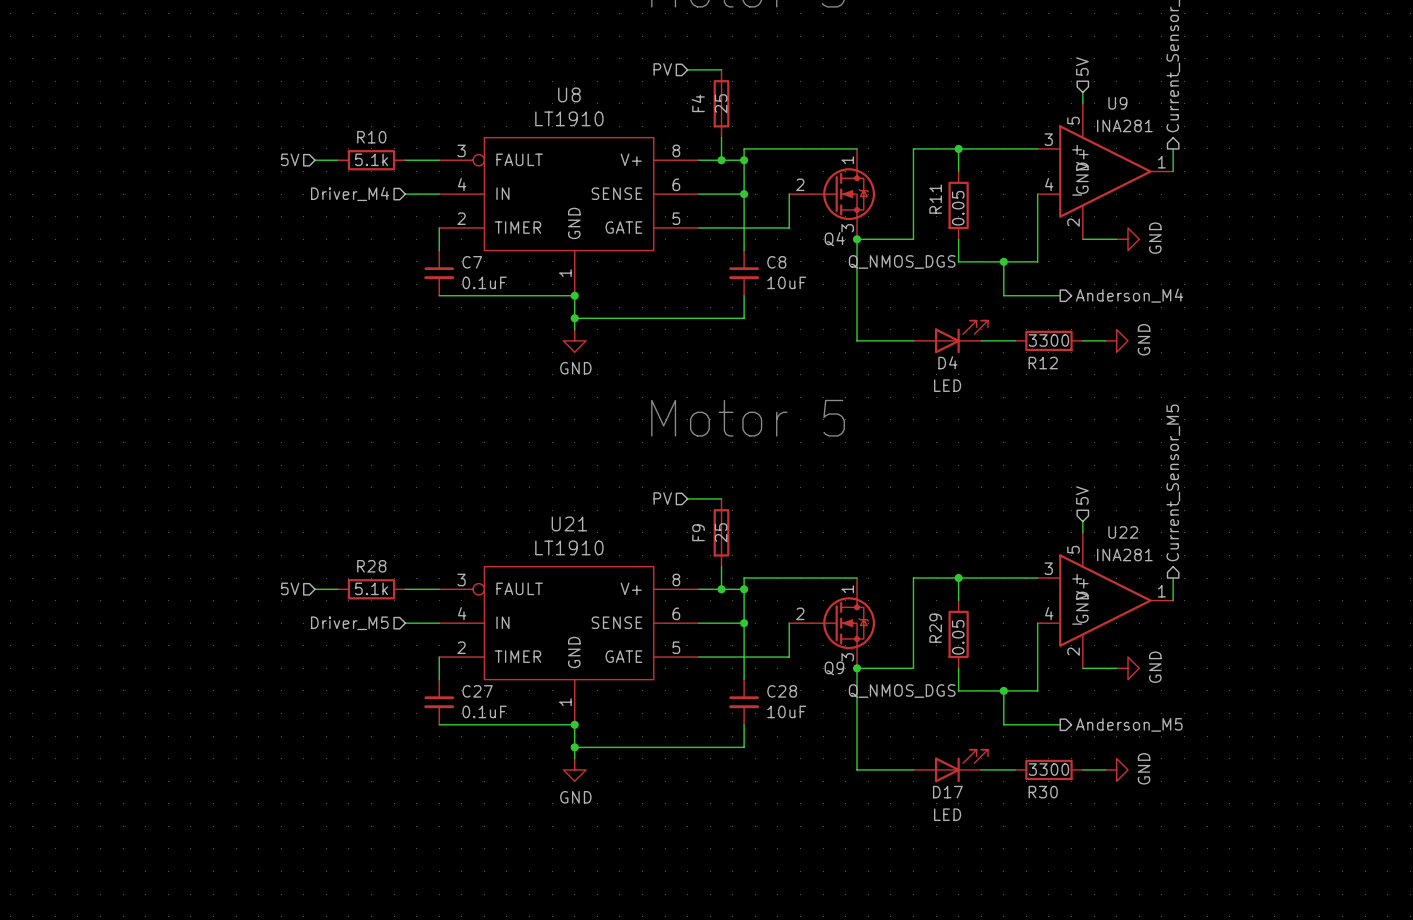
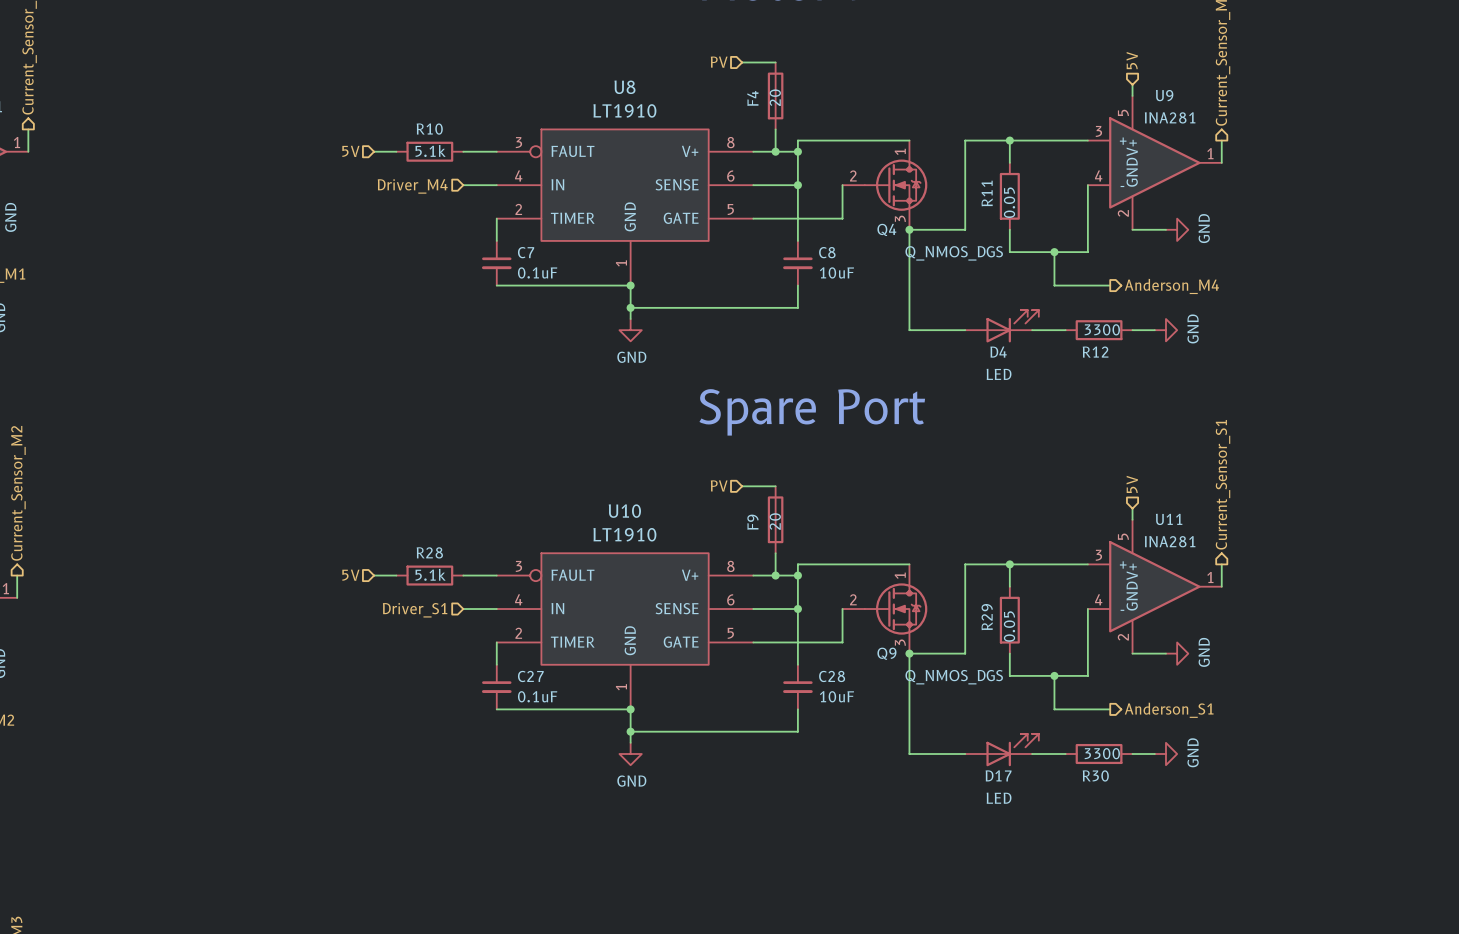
F4 value: 25 (721, 103) -> 20 (775, 97)
text: Motor 5 (748, 418) -> Spare Port (812, 412)
hierarchical label: Current_Sensor_M5 (1173, 482) -> Current_Sensor_S1 (1223, 484)
U21 name: U21 (569, 523) -> U10 (624, 511)
F9 value: 25 (721, 532) -> 20 (775, 521)
U22 name: U22 (1123, 532) -> U11 (1169, 519)
hierarchical label: Driver_M5 (349, 623) -> Driver_S1 (415, 610)
hierarchical label: Anderson_M5 (1129, 724) -> Anderson_S1 (1169, 710)

